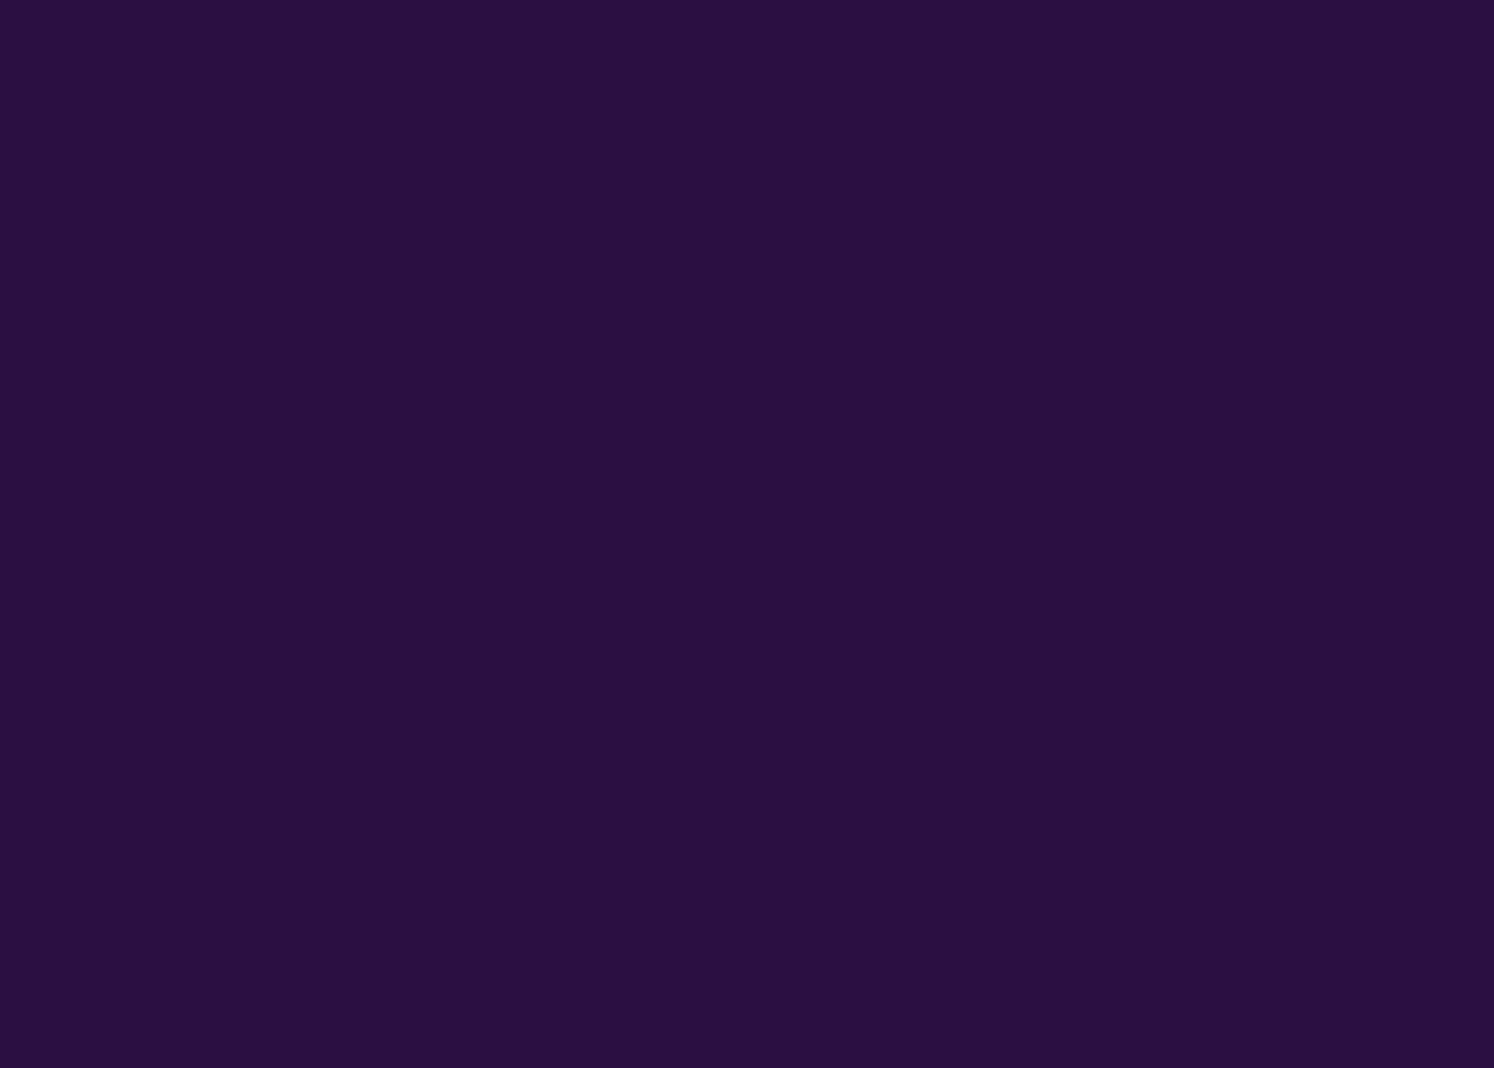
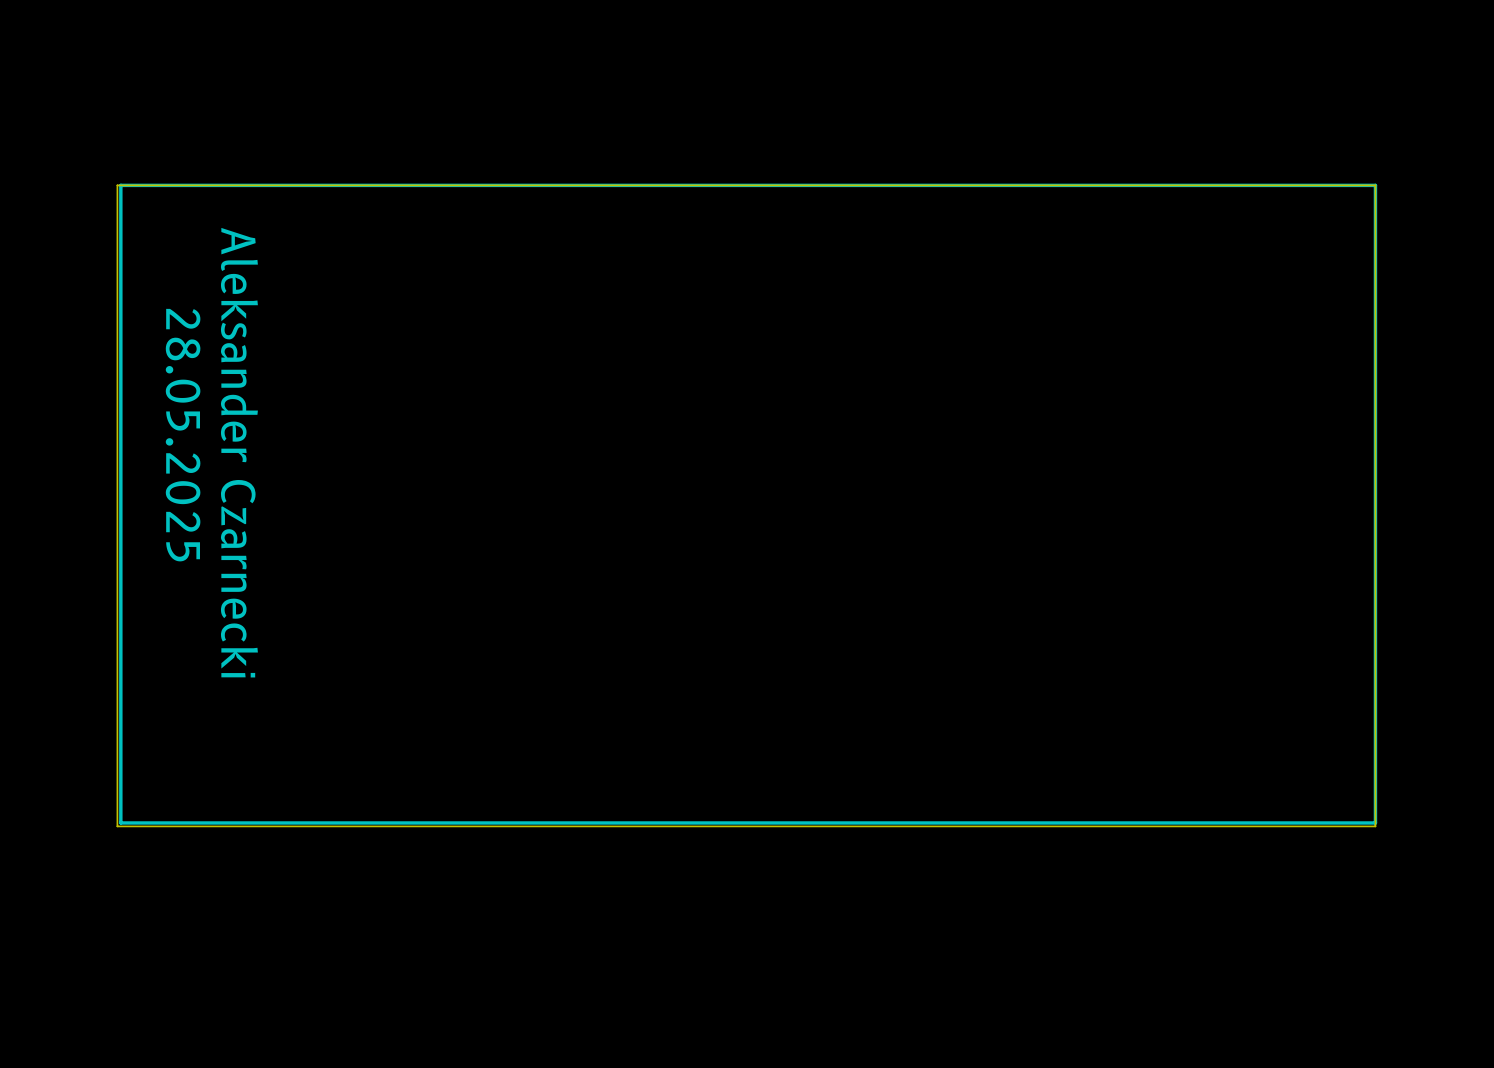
line: none -> (1375, 185) (120, 185) (120, 822) (1375, 822) (1375, 185)
board edge: none -> (1375, 185) (117, 185) (117, 826) (1375, 826) (1375, 185)
text: none -> 28.05.2025 (183, 435)
text: none -> Aleksander Czarnecki (239, 452)

